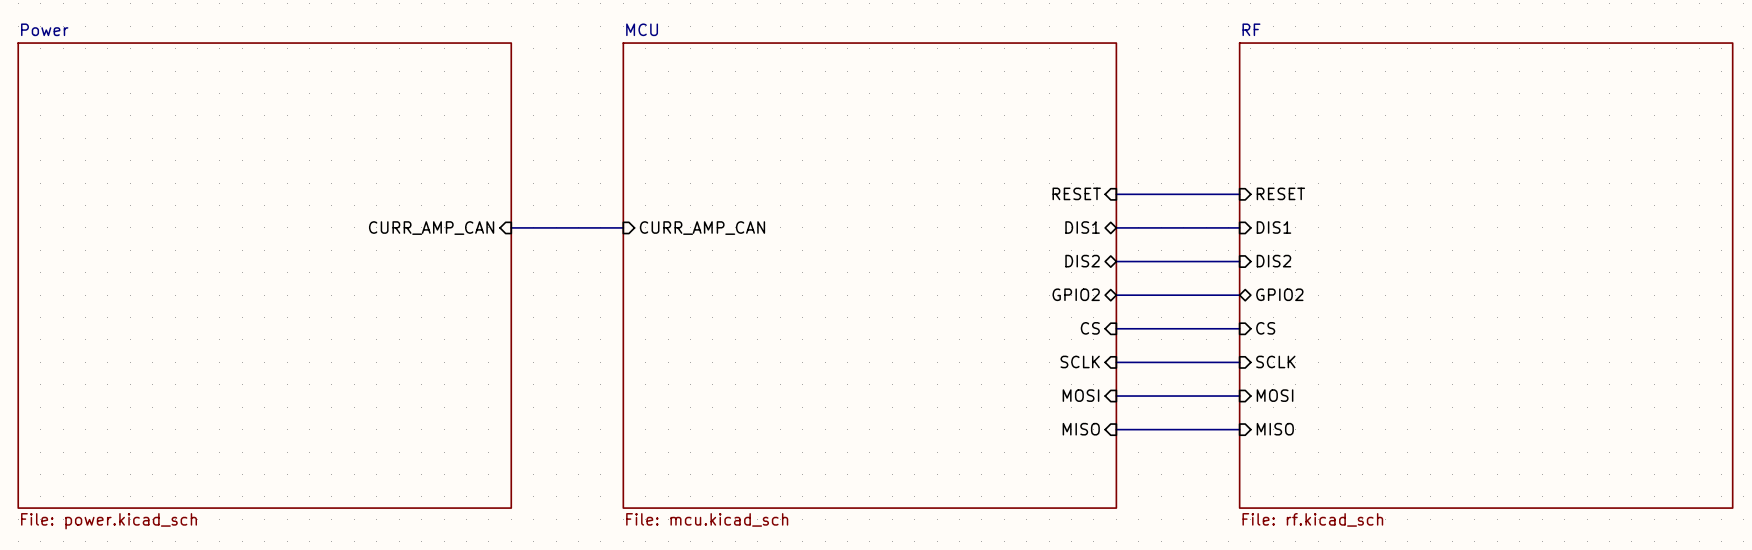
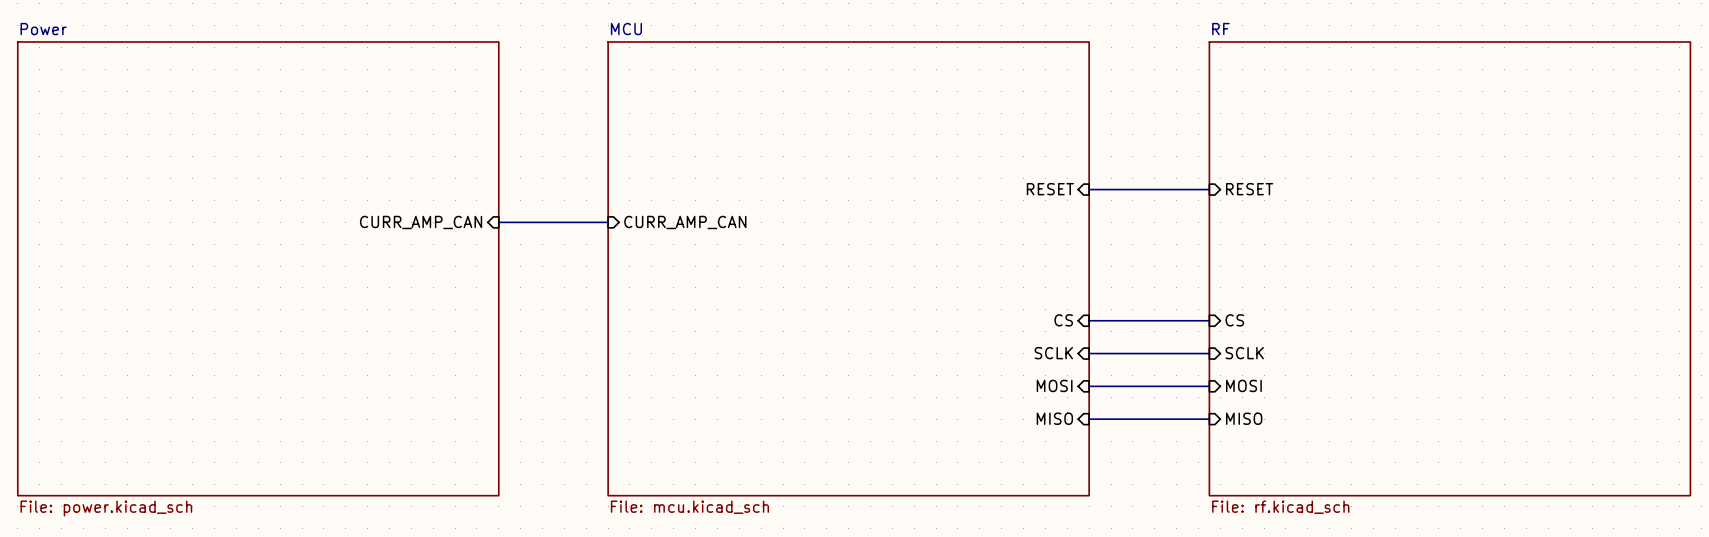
sheet pin: DIS1 (1082, 227) -> none
wire: (1116, 227) (1239, 227) -> none
sheet pin: DIS1 (1273, 227) -> none
sheet pin: DIS2 (1082, 261) -> none
wire: (1116, 261) (1239, 261) -> none
sheet pin: DIS2 (1273, 261) -> none
sheet pin: GPIO2 (1076, 294) -> none
sheet pin: GPIO2 (1279, 294) -> none
wire: (1116, 295) (1239, 295) -> none

